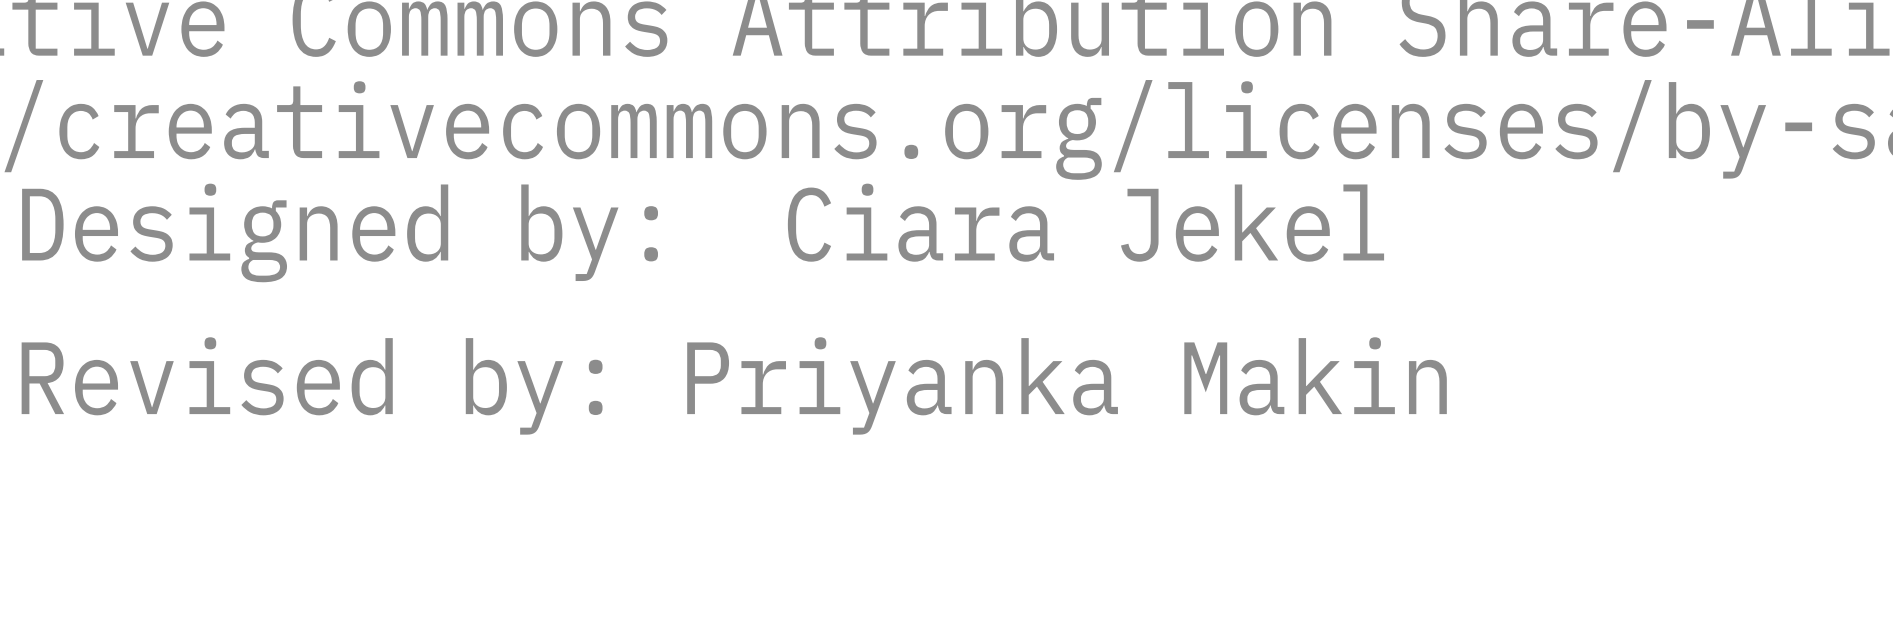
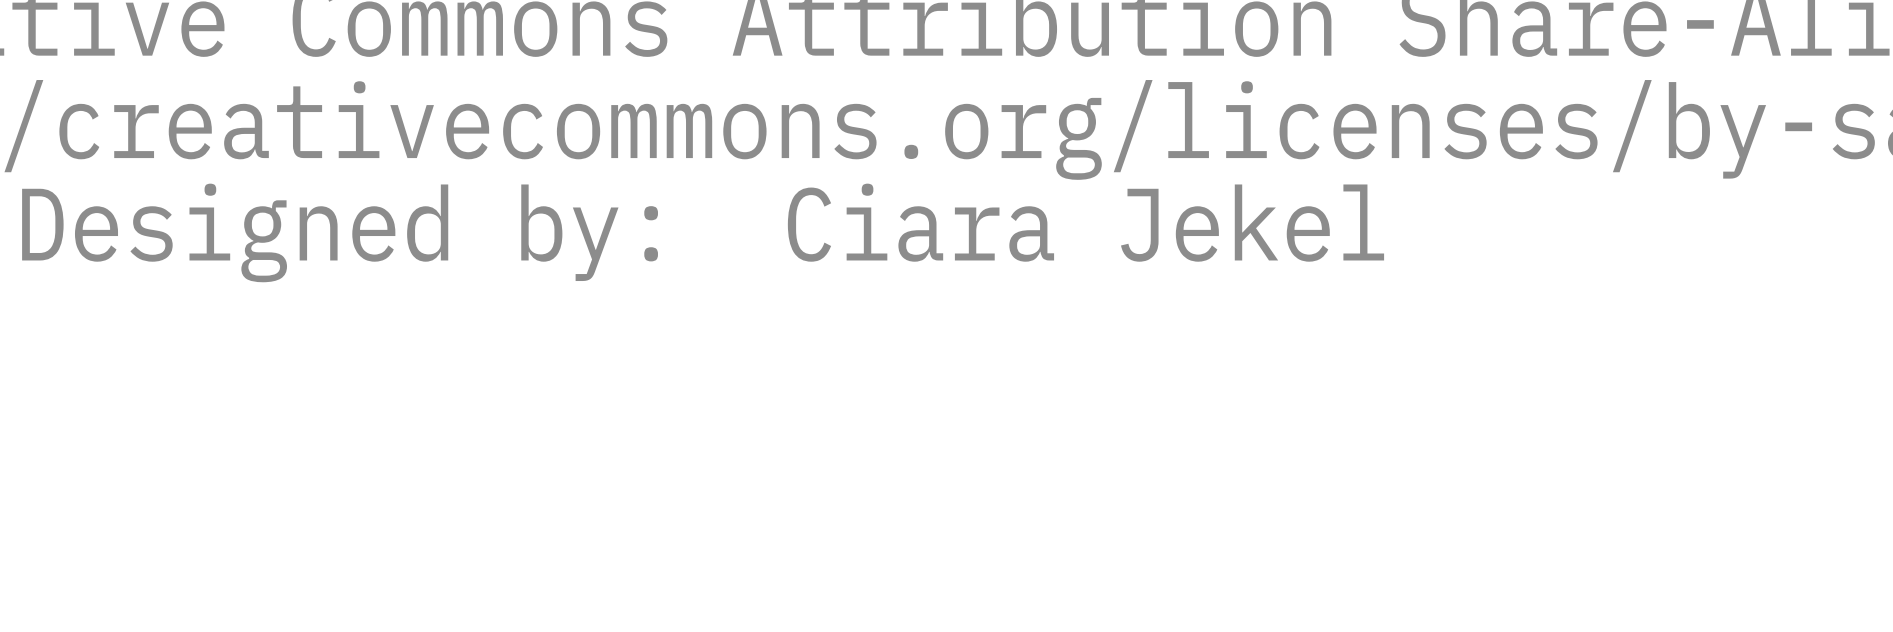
text: Revised by: Priyanka Makin (734, 385) -> none

